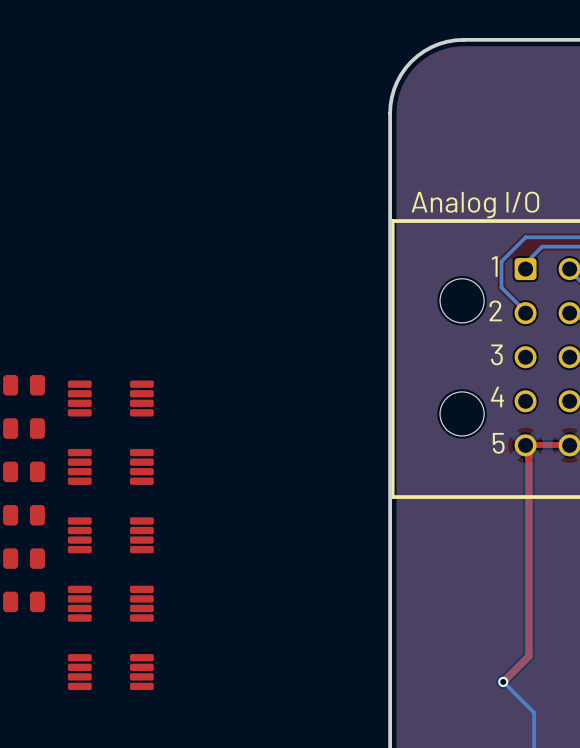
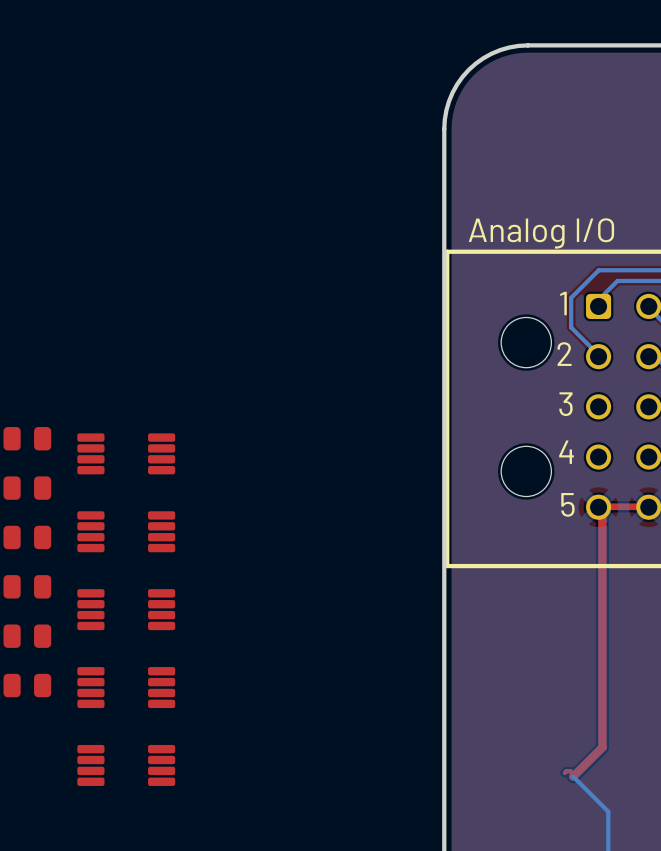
top track: none -> (572, 773) (570, 771) (564, 773)
via: (503, 681) -> none

